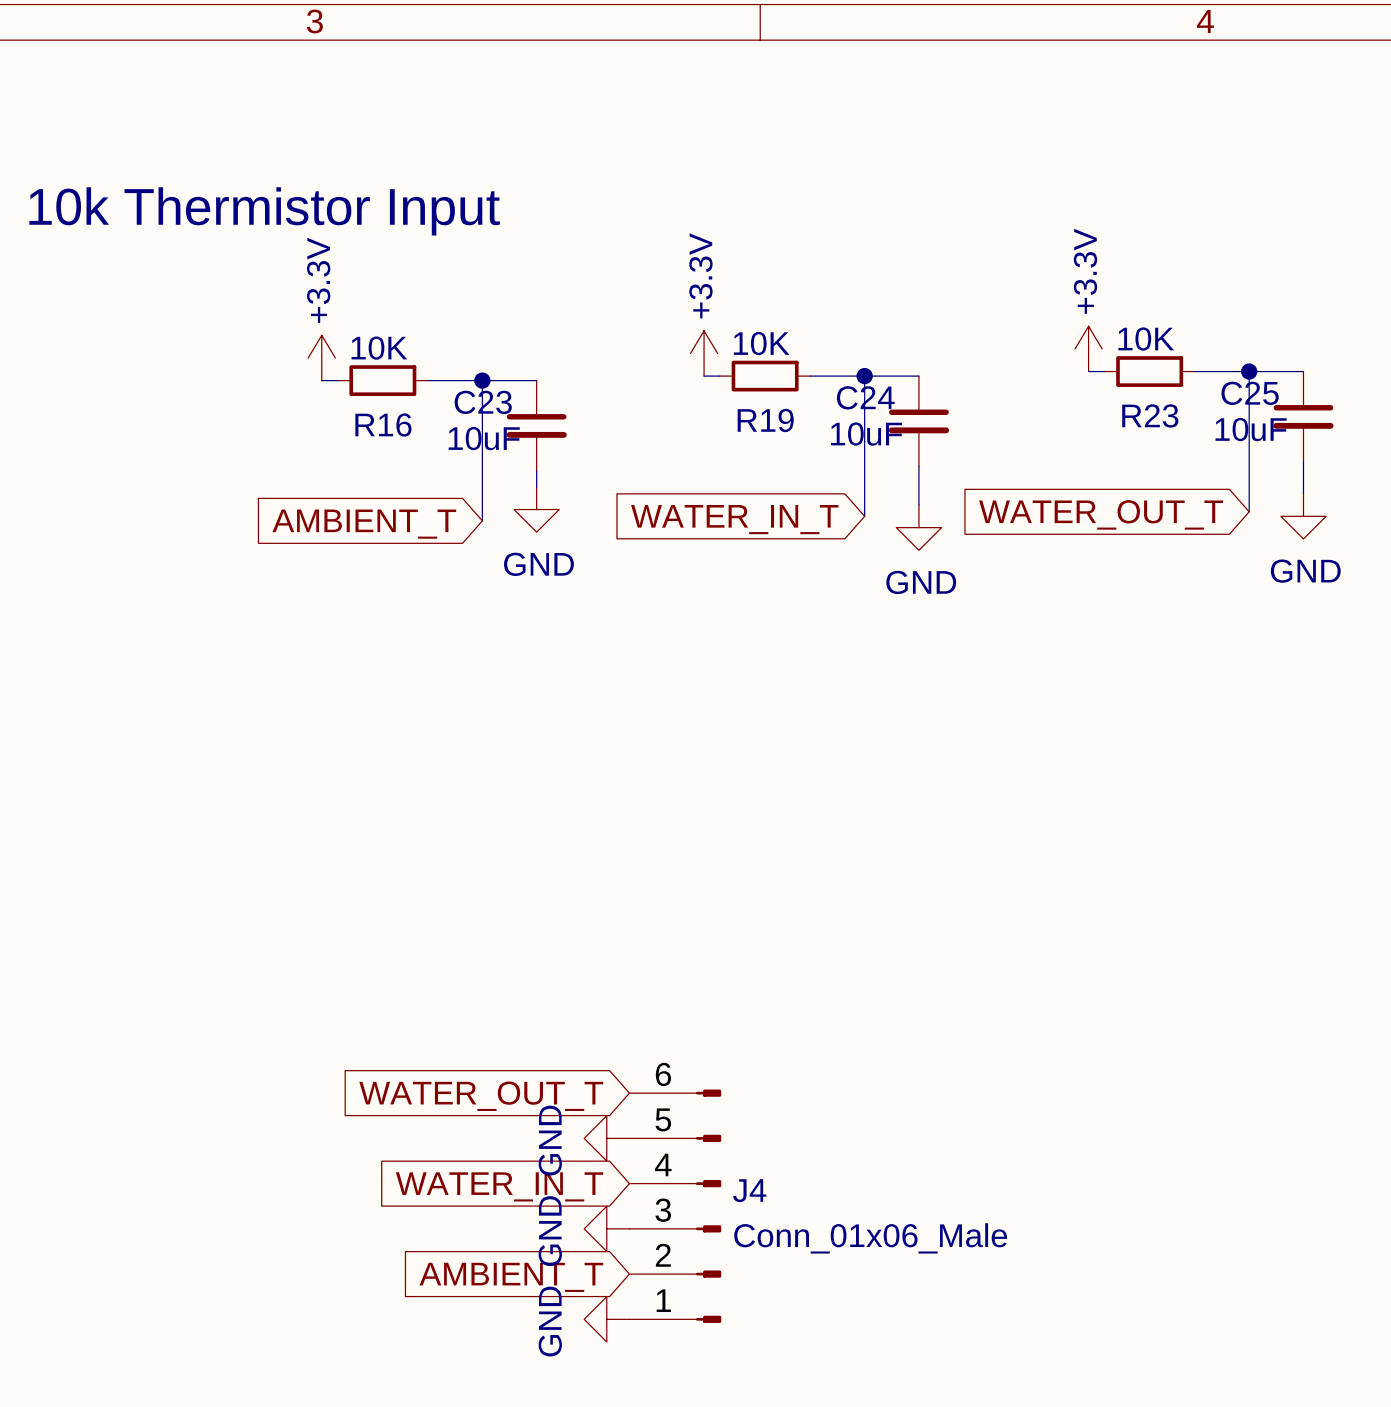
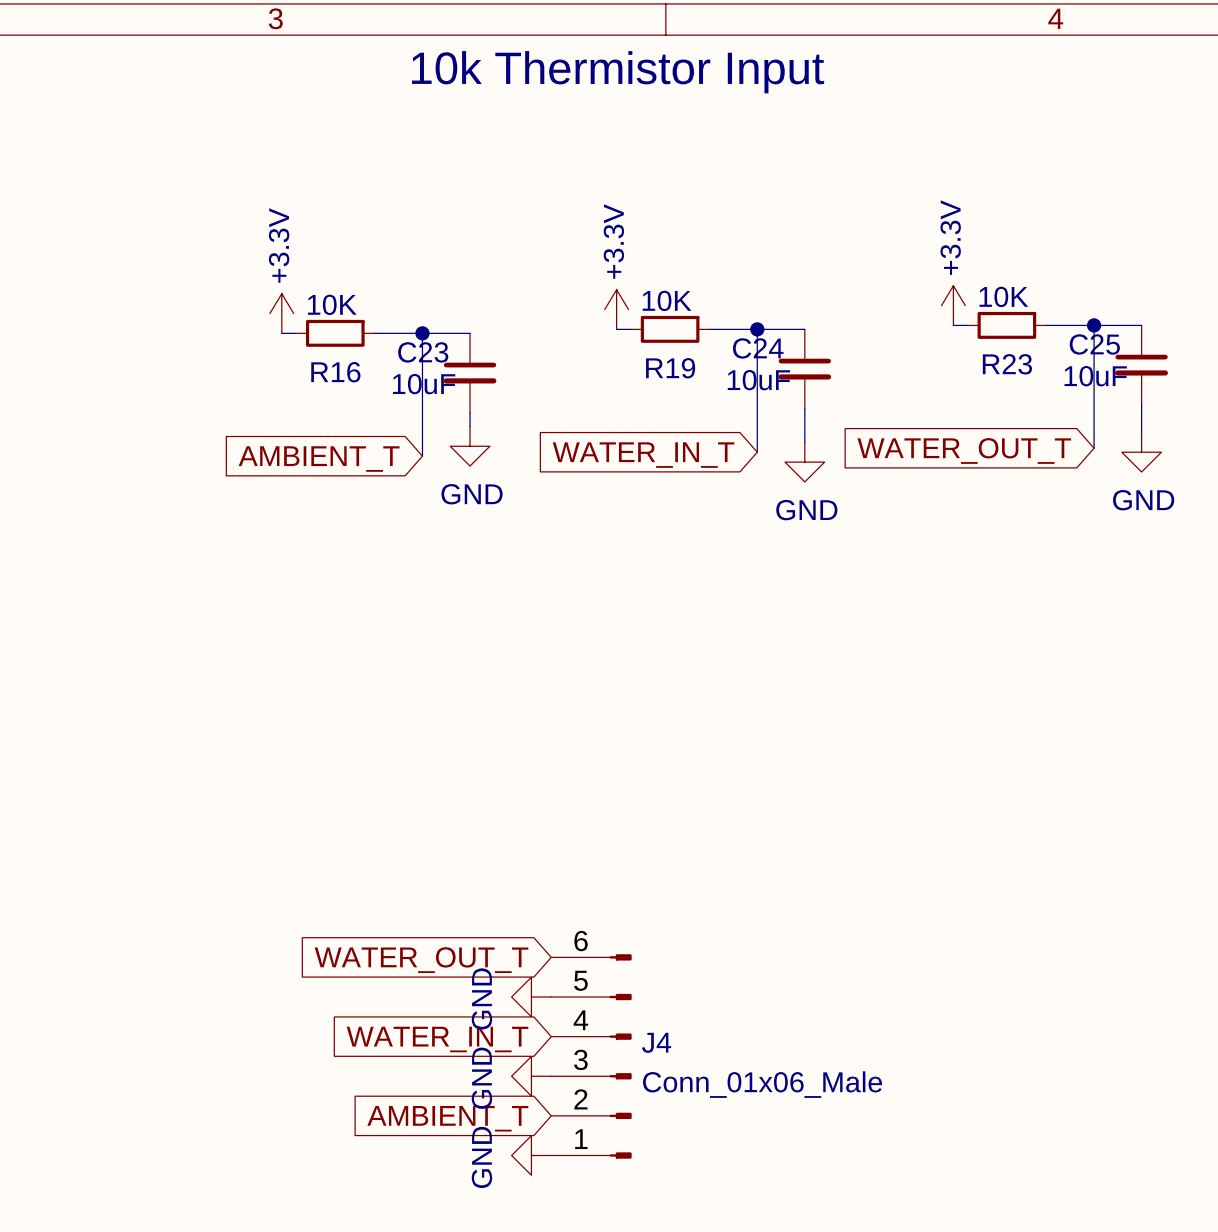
text: none -> 10k Thermistor Input (618, 72)
text: 10k Thermistor Input (264, 211) -> none

